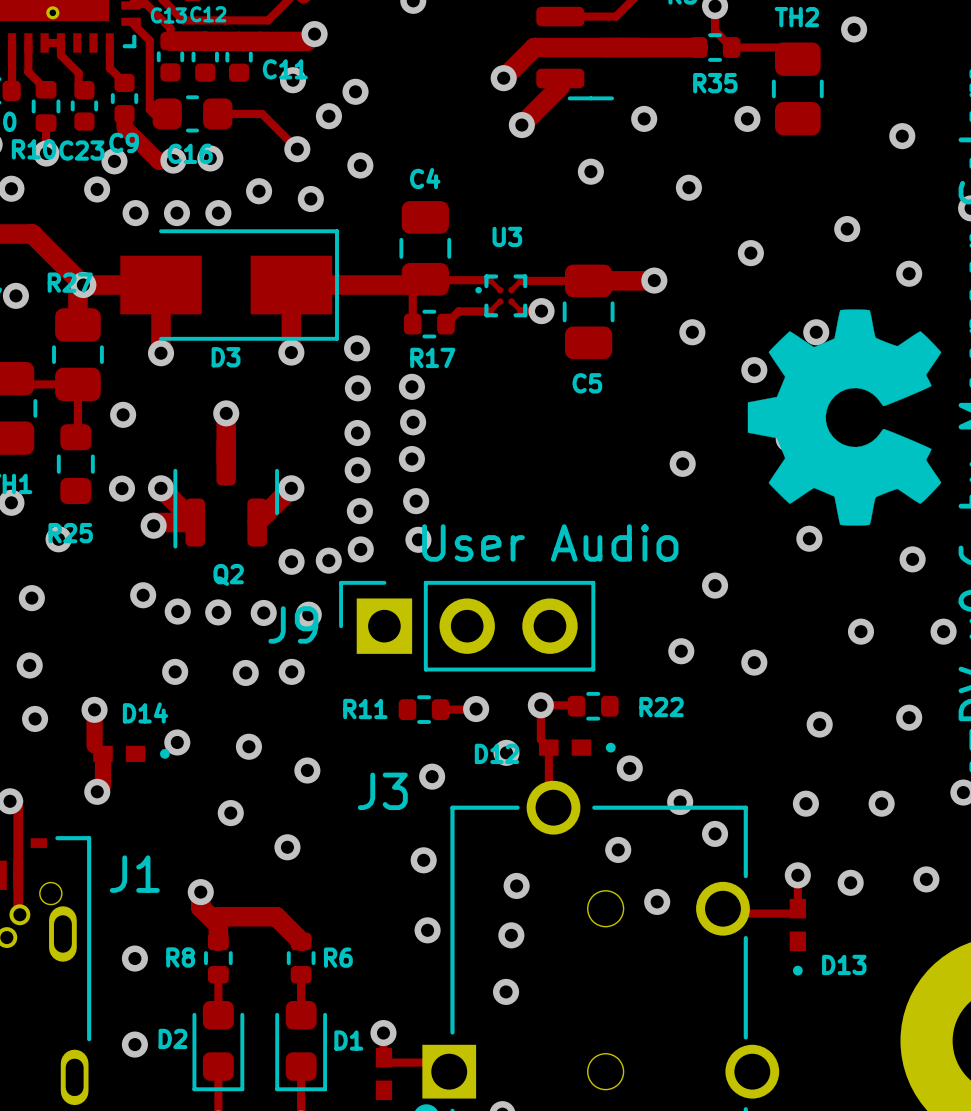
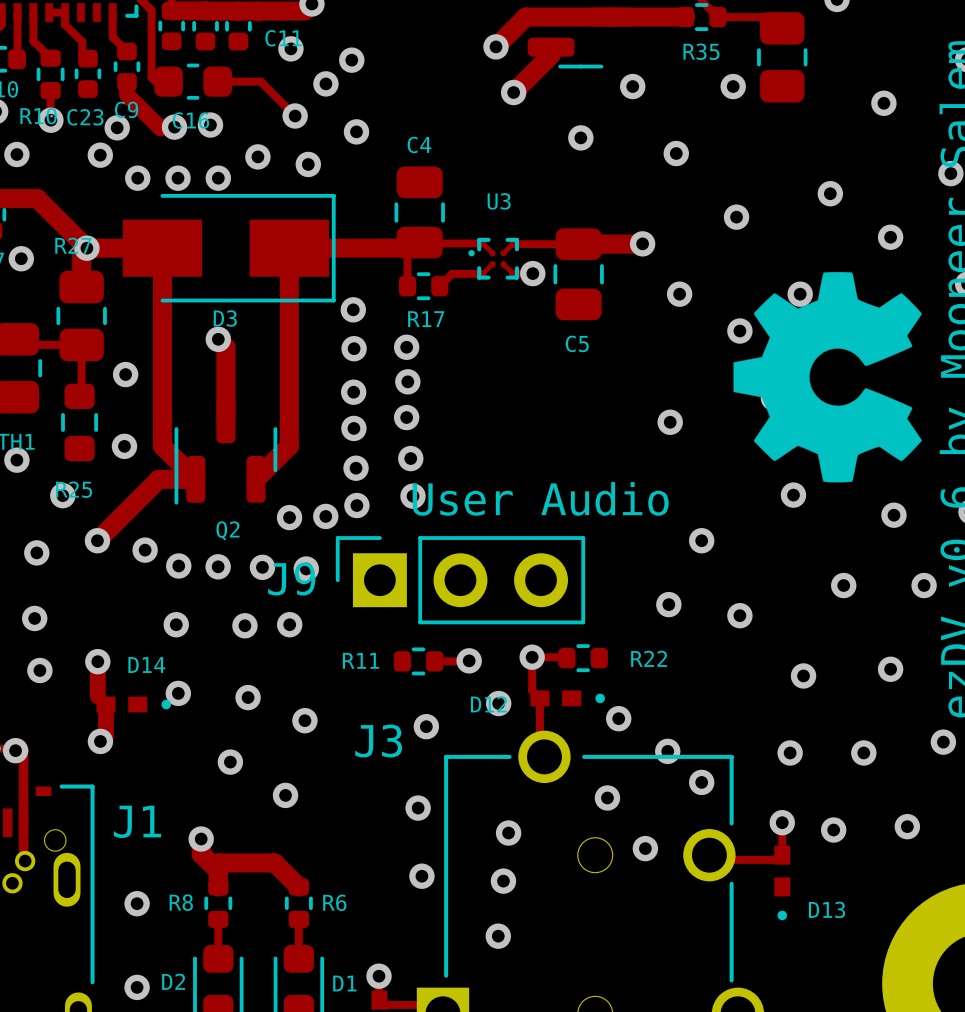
top track: none -> (289, 313) (289, 446)
via: (291, 352) -> none
top track: none -> (162, 314) (162, 446)
via: (161, 353) -> none
top track: none -> (218, 339) (225, 346) (225, 373)
via: none -> (218, 339)
via: (226, 413) -> none
via: (161, 488) -> none
via: (291, 488) -> none
top track: none -> (158, 479) (97, 540)
via: (153, 525) -> none
via: none -> (97, 540)

